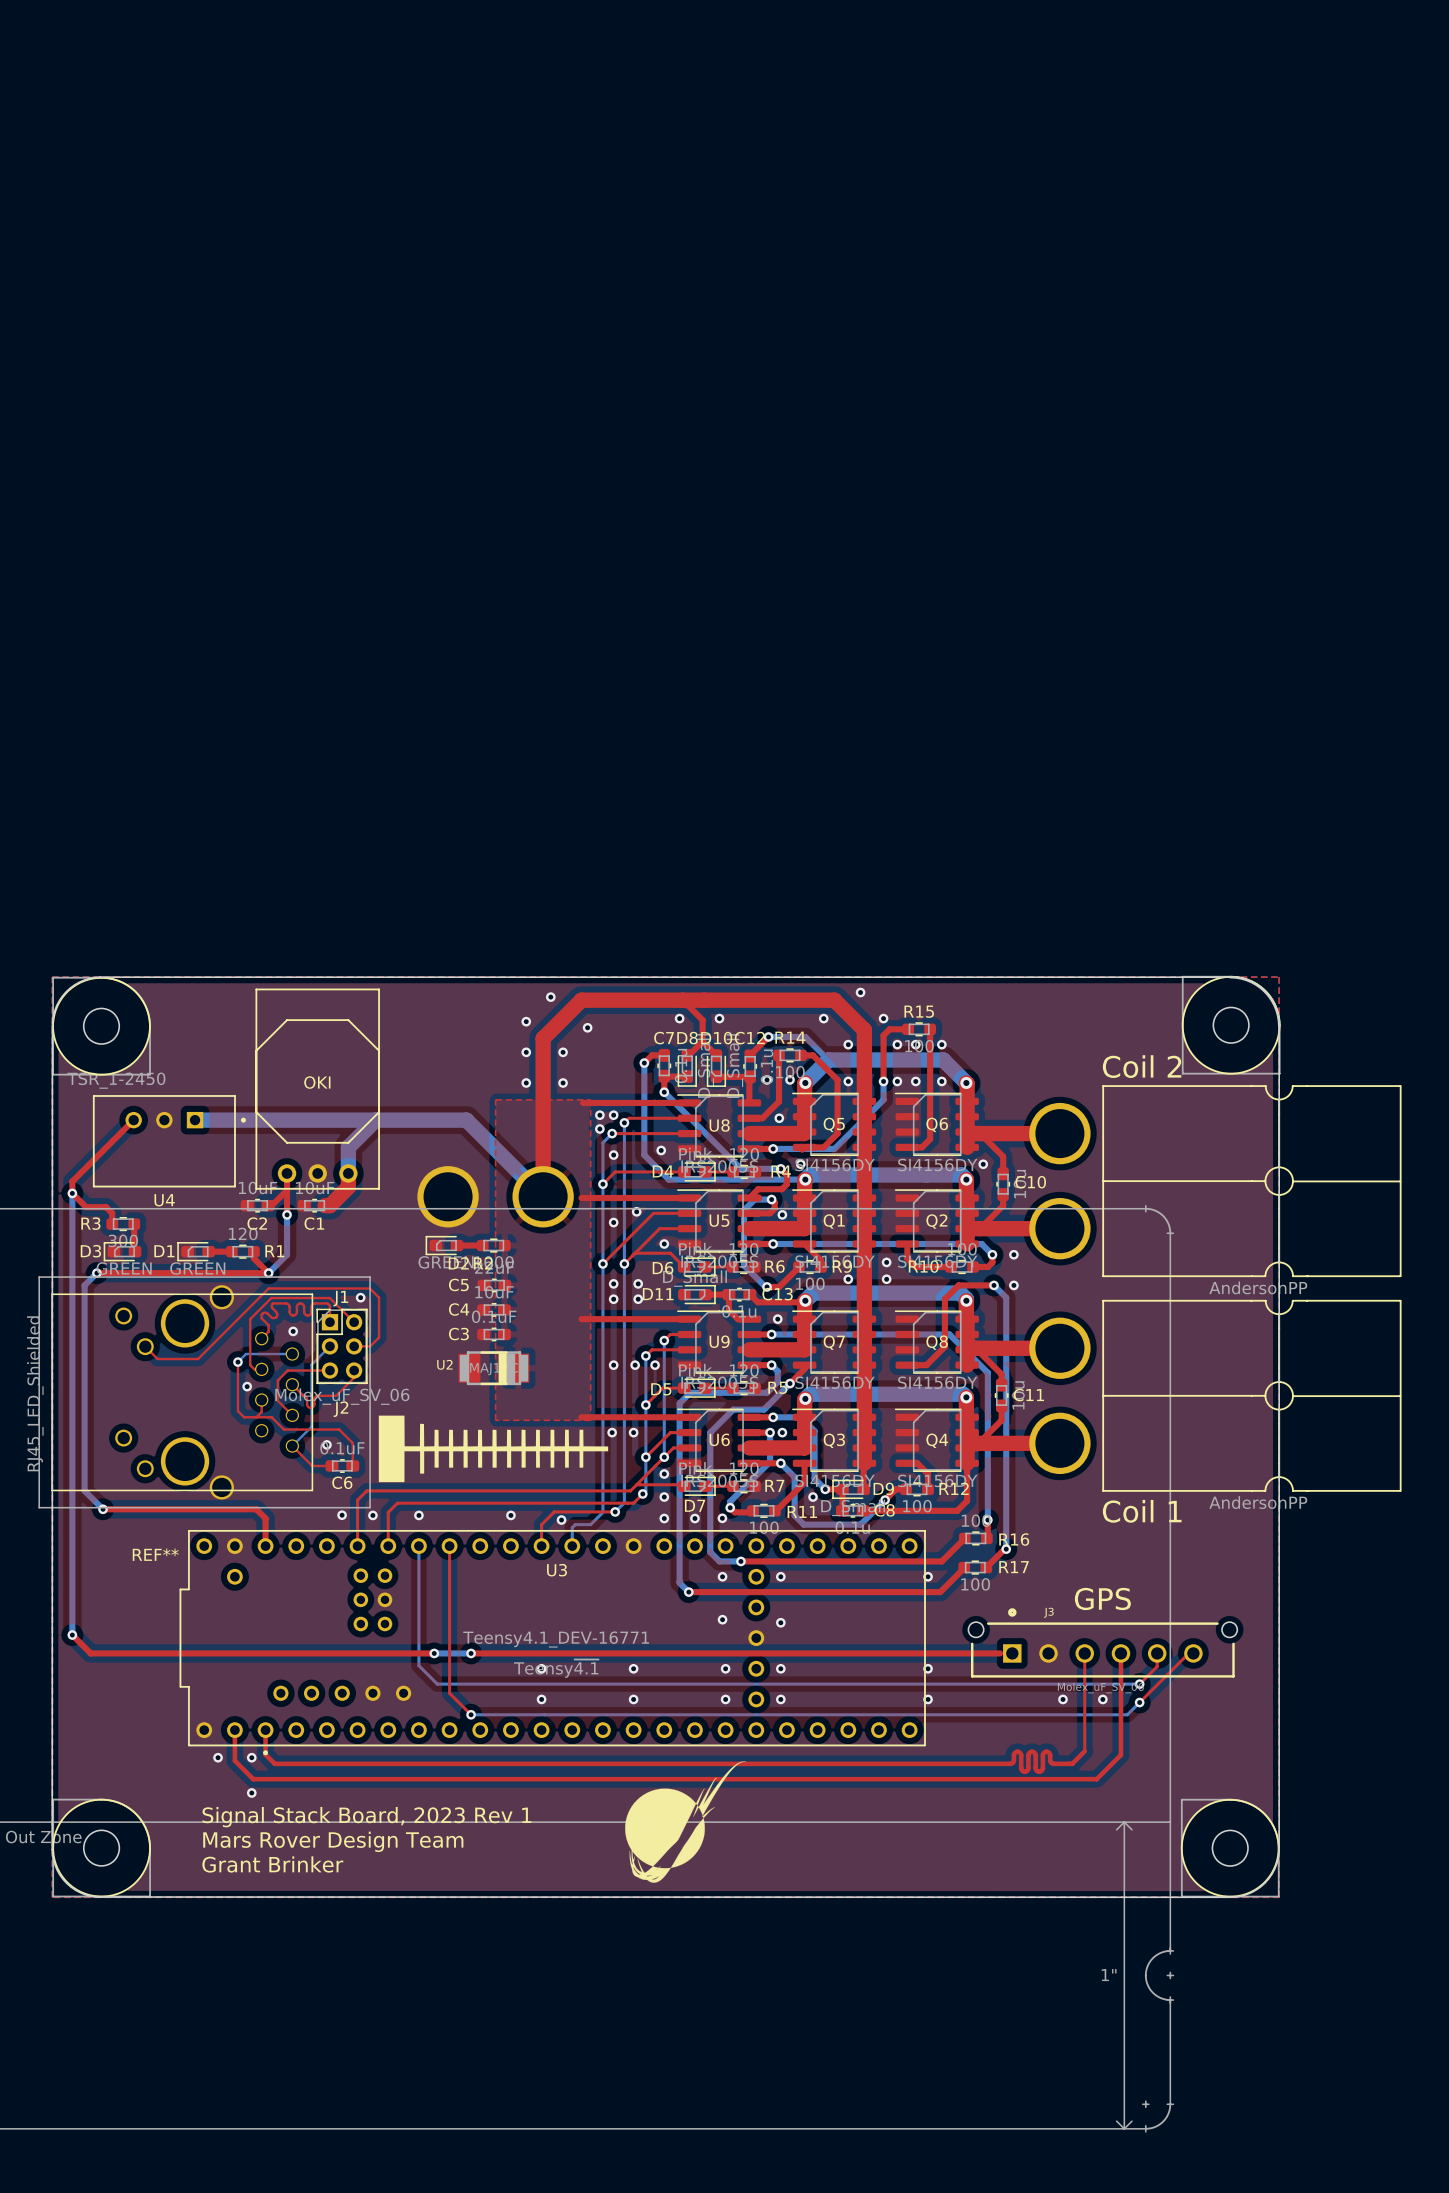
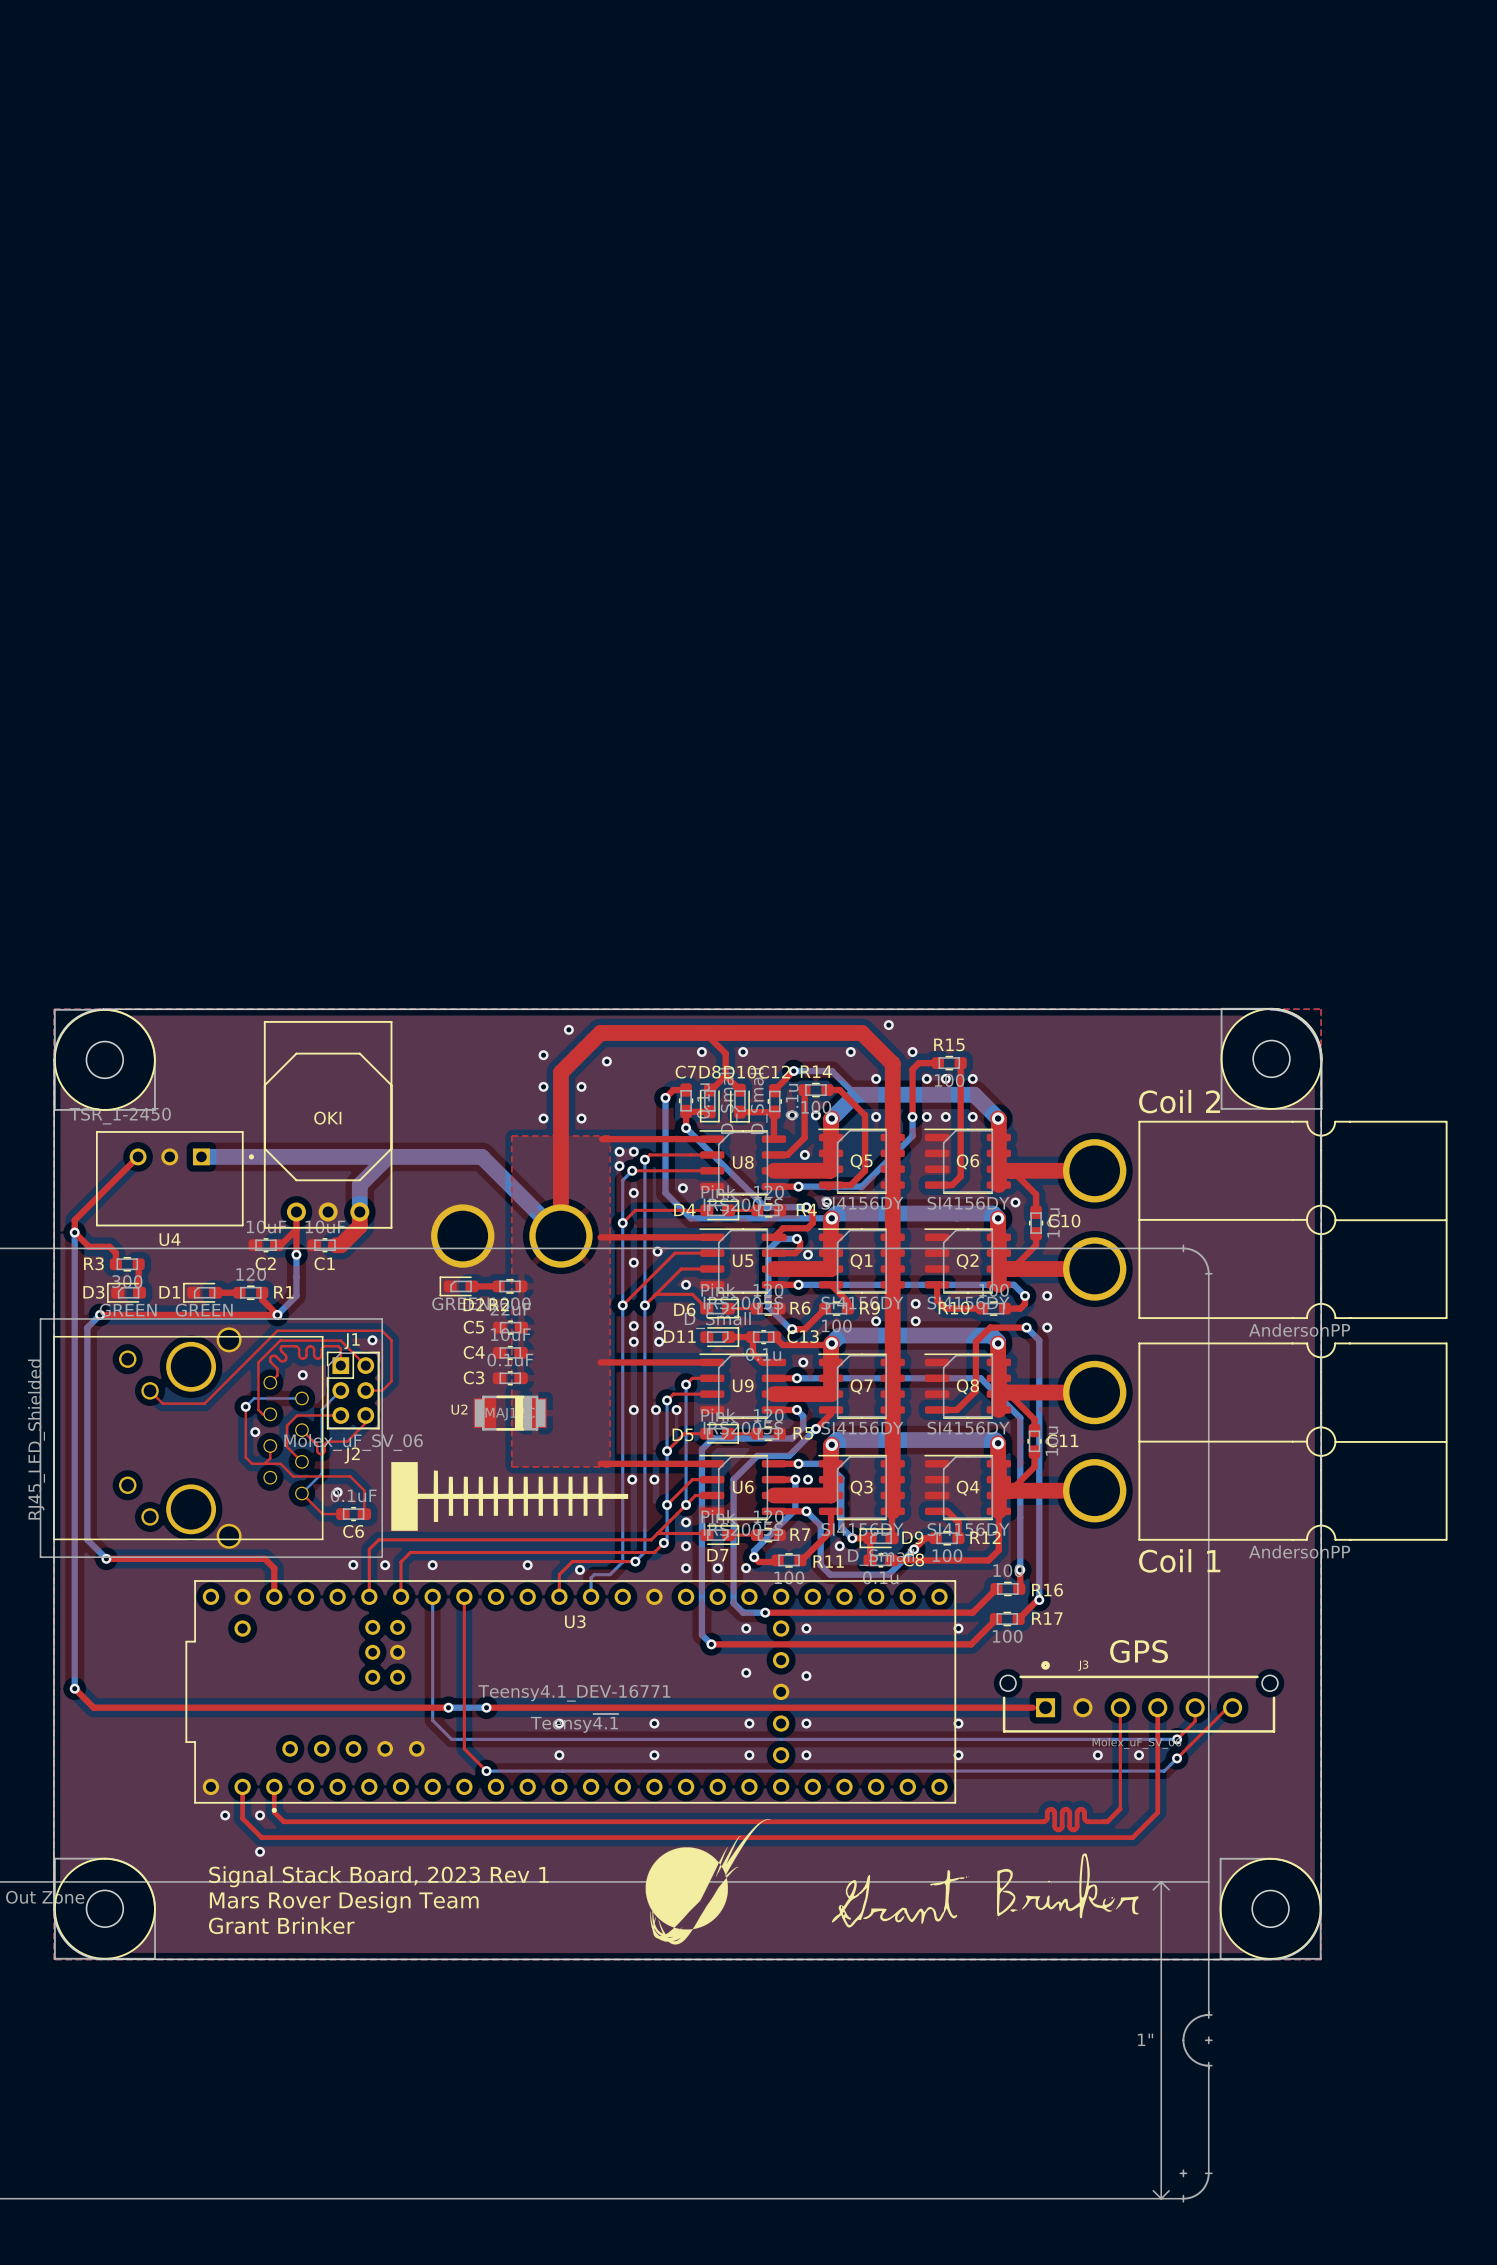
U3 text: REF** (155, 1554) -> none
drawing: none -> [831, 1853, 1139, 1928]

